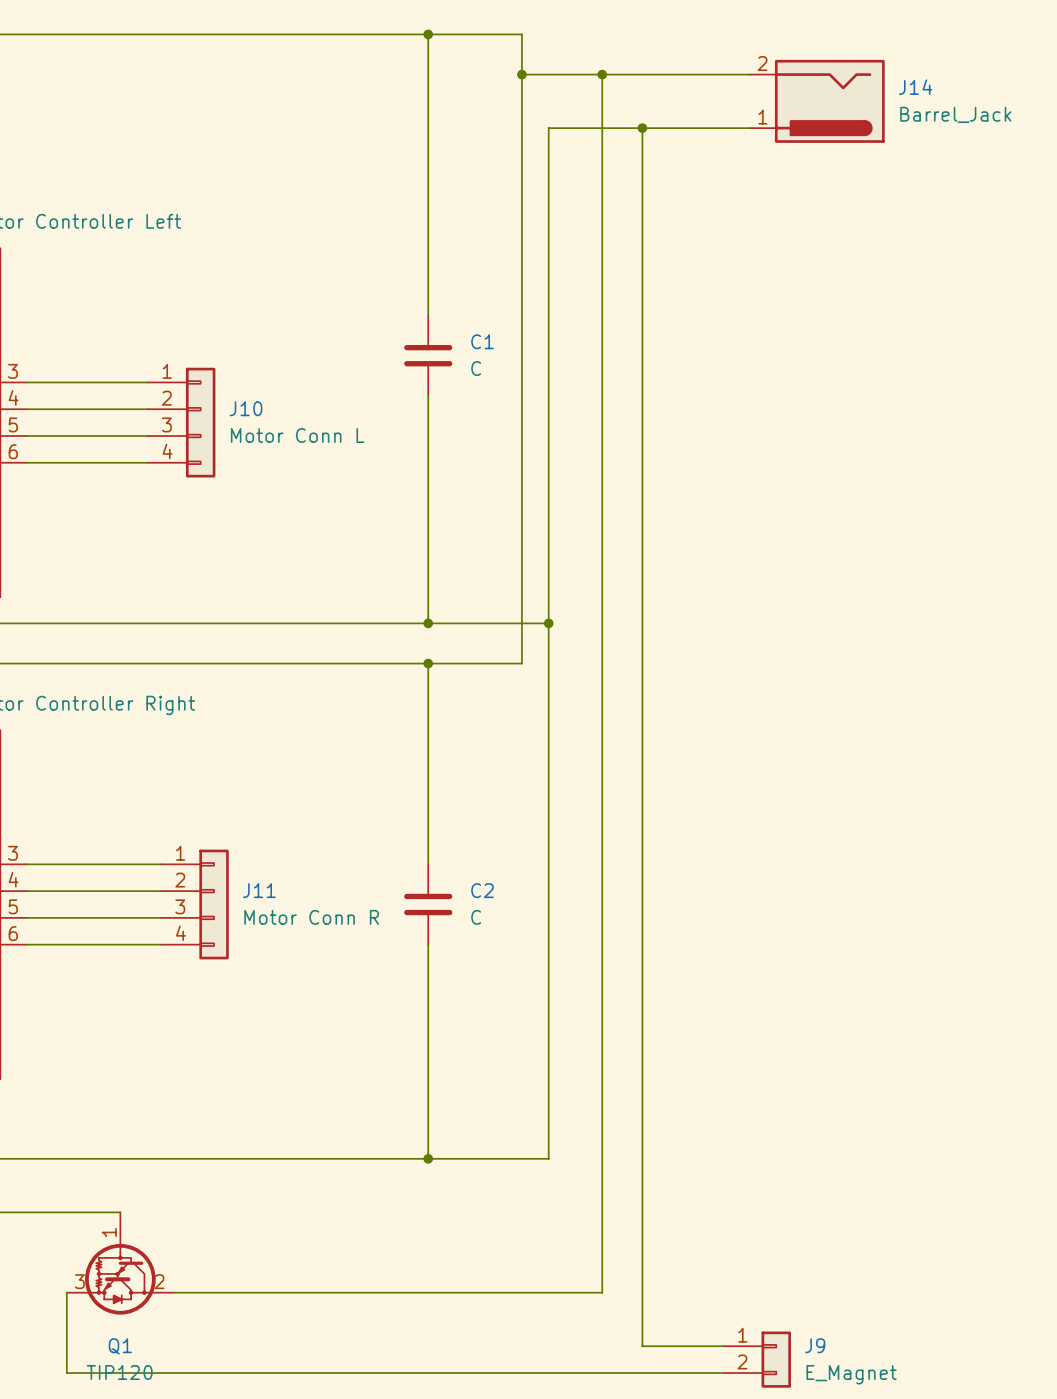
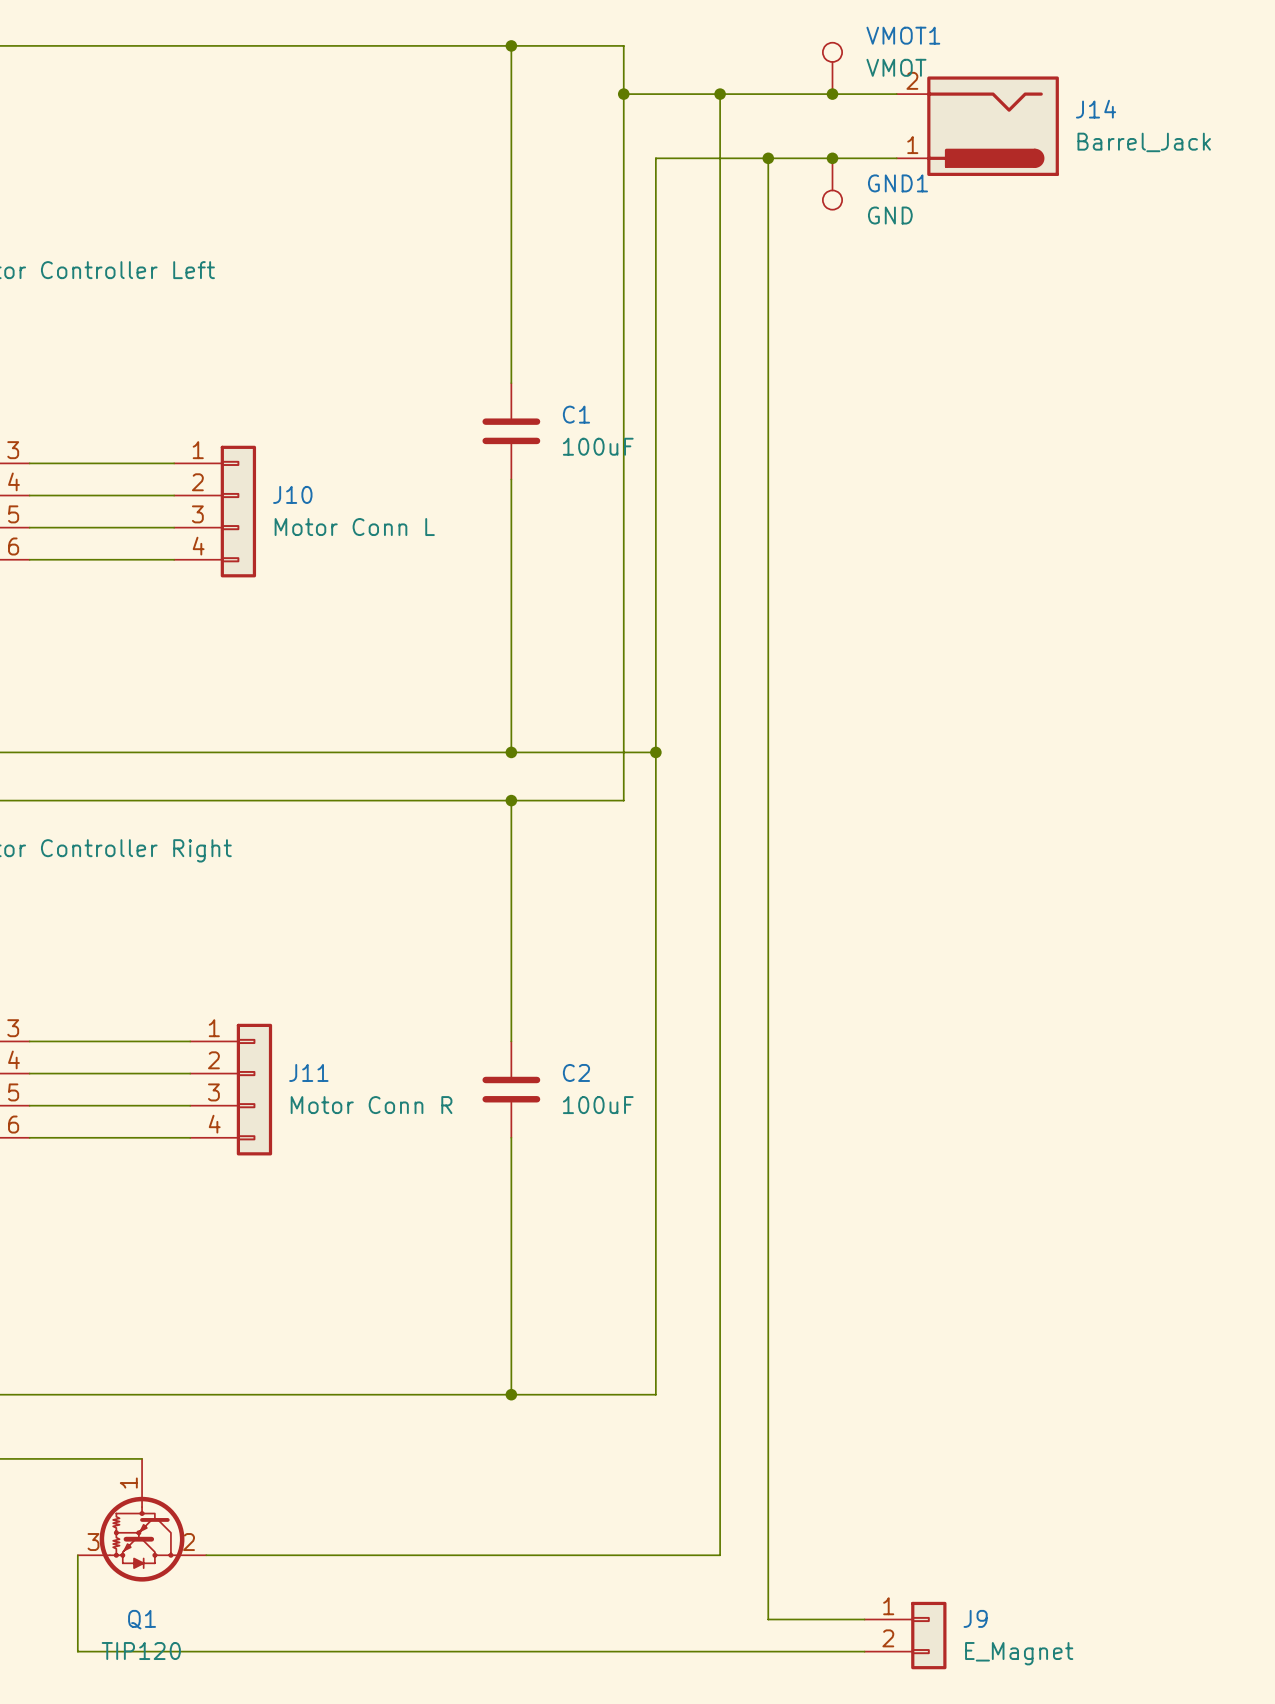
VMOT1: none -> VMOT (832, 68)
junction: none -> (832, 94)
junction: none -> (832, 158)
GND1: none -> GND (832, 184)
C1 value: C (476, 368) -> 100uF (598, 446)
C2 value: C (476, 917) -> 100uF (598, 1105)

